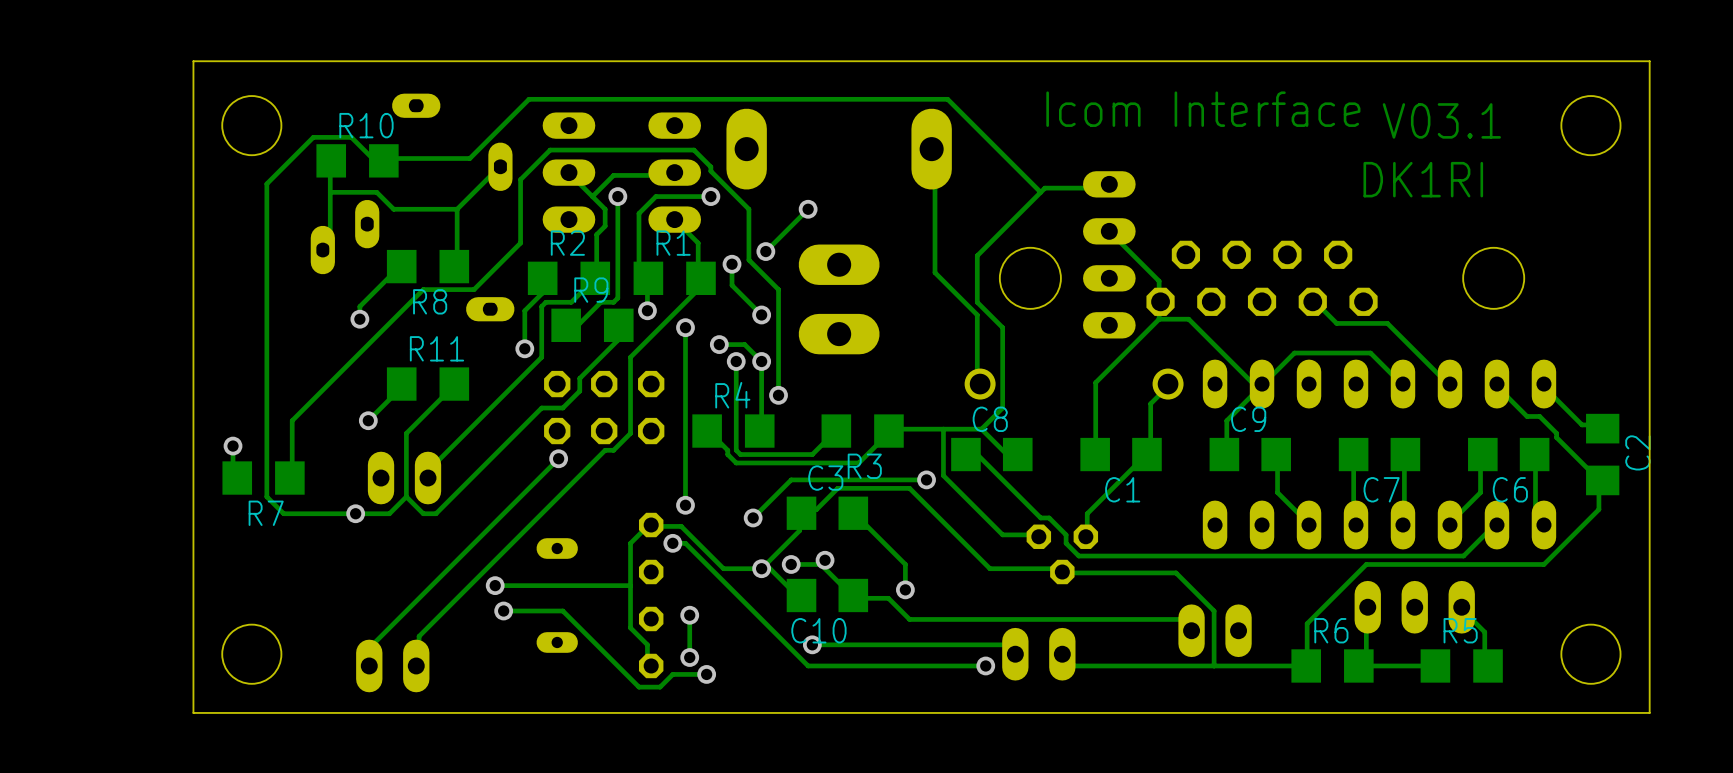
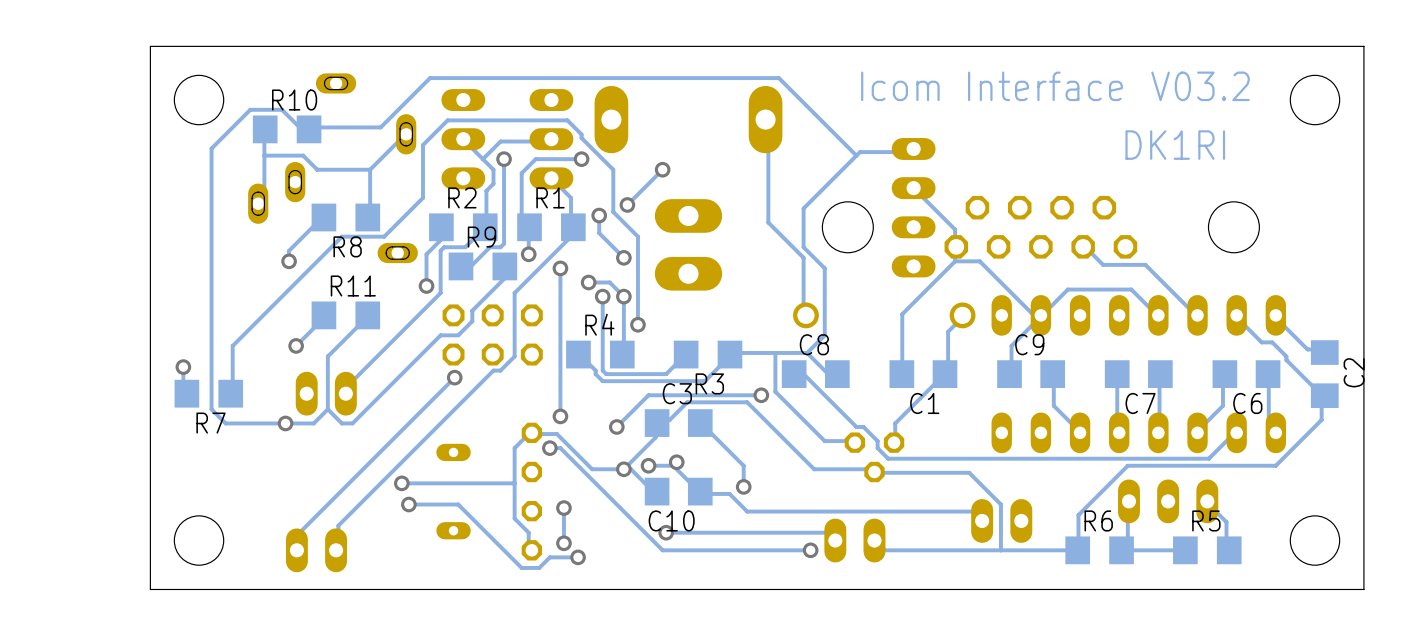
text: V03.1 (1441, 120) -> V03.2 (1200, 86)

